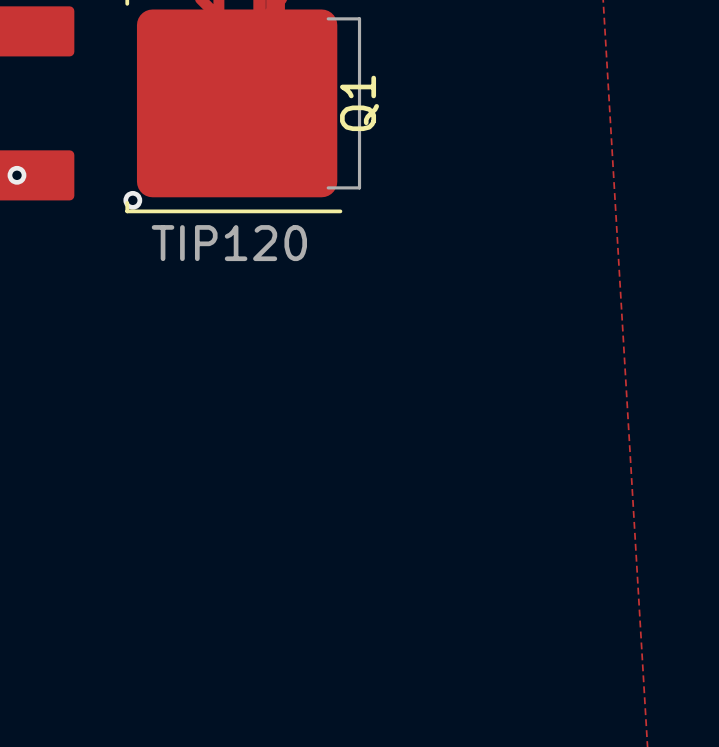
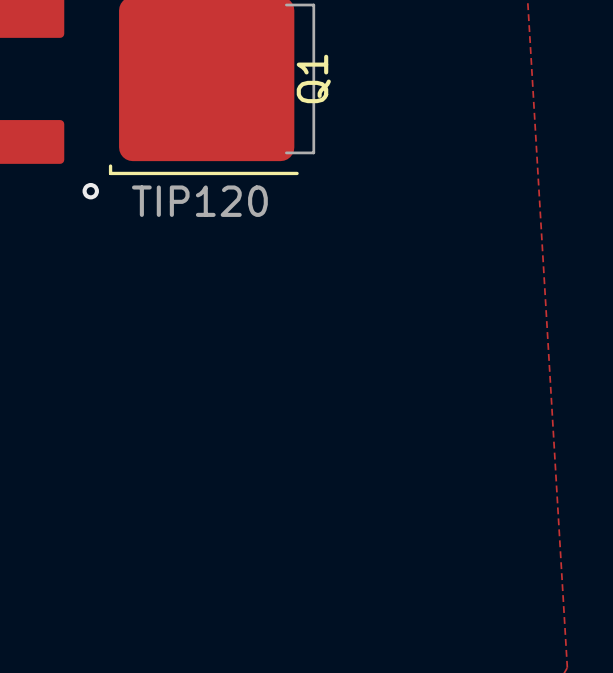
via: (16, 175) -> none
via position: (132, 200) -> (90, 191)

